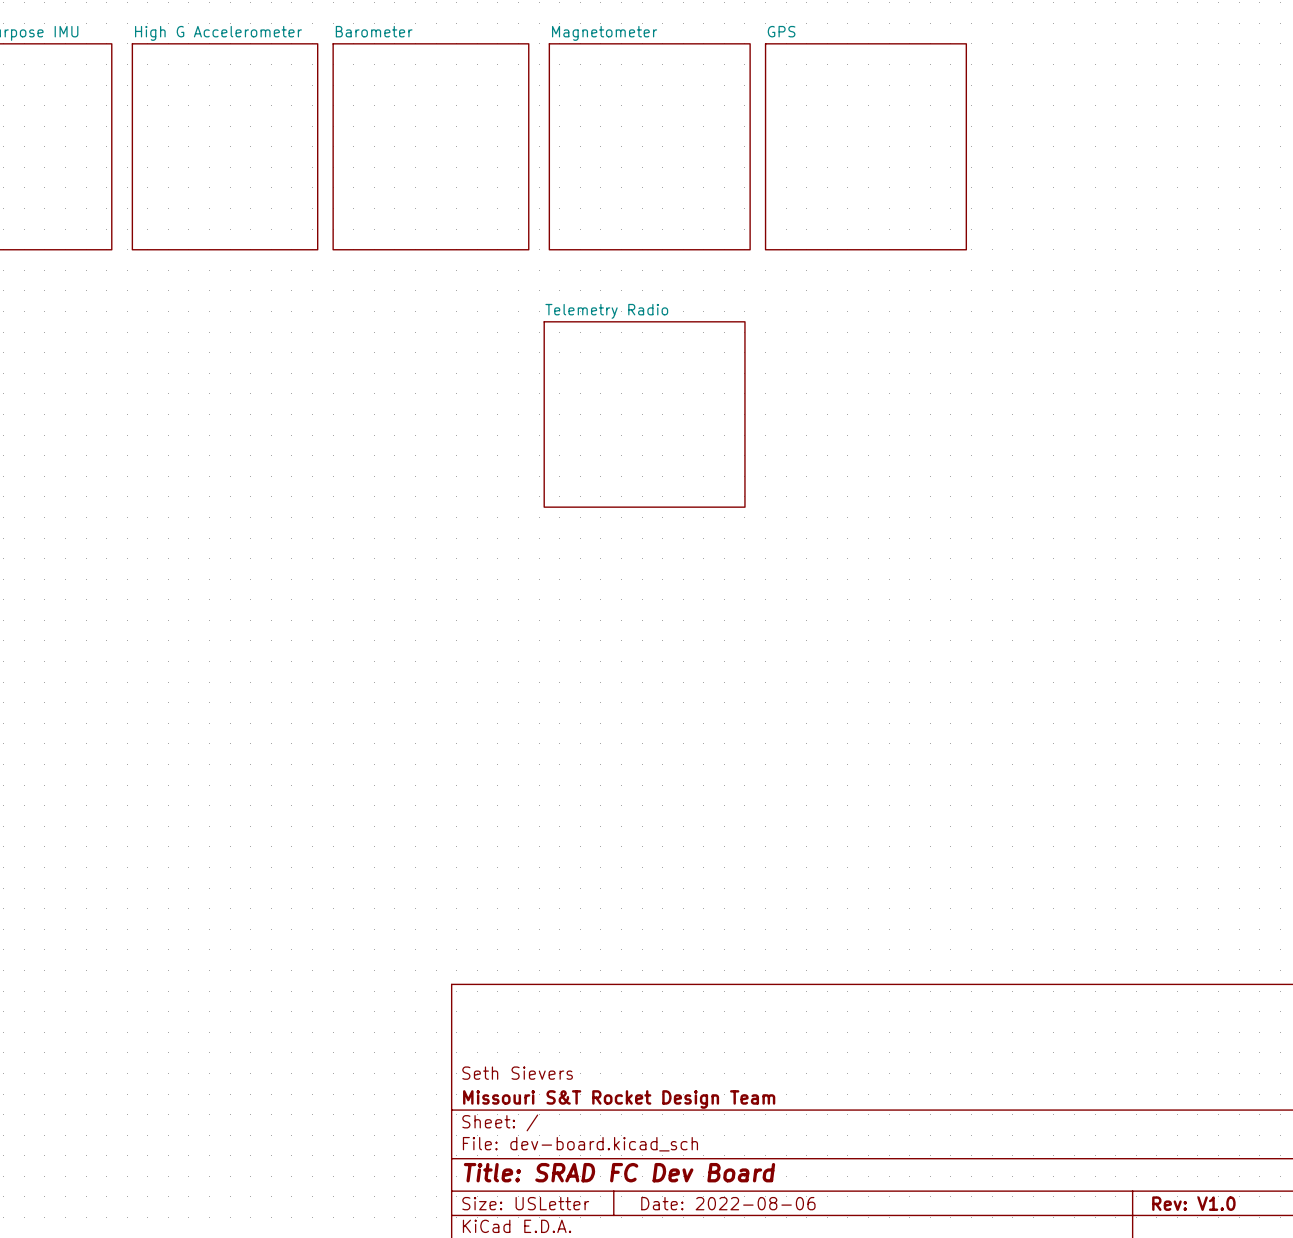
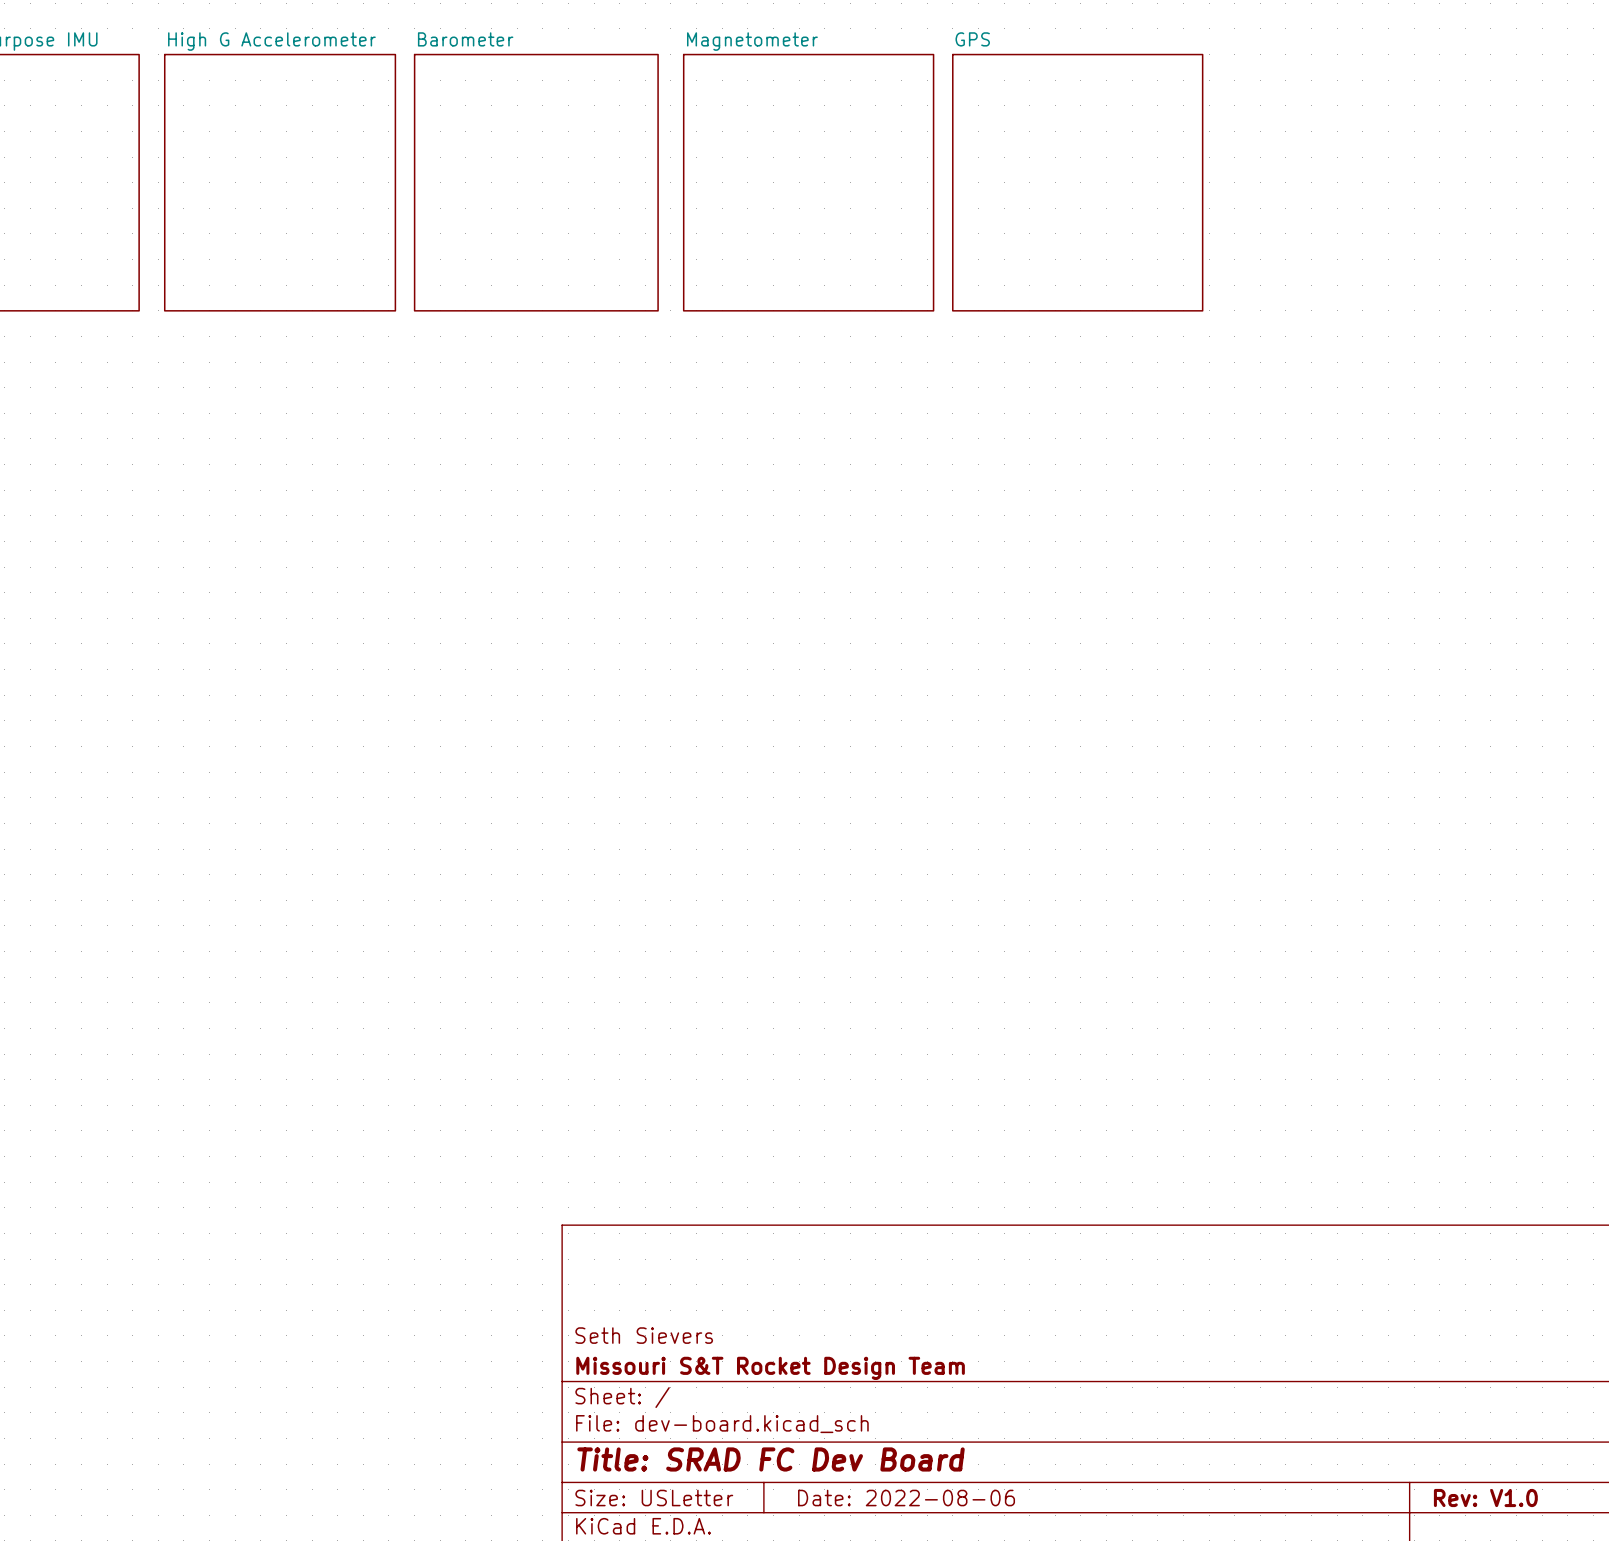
sheet Telemetry Radio: (644, 414) -> none

